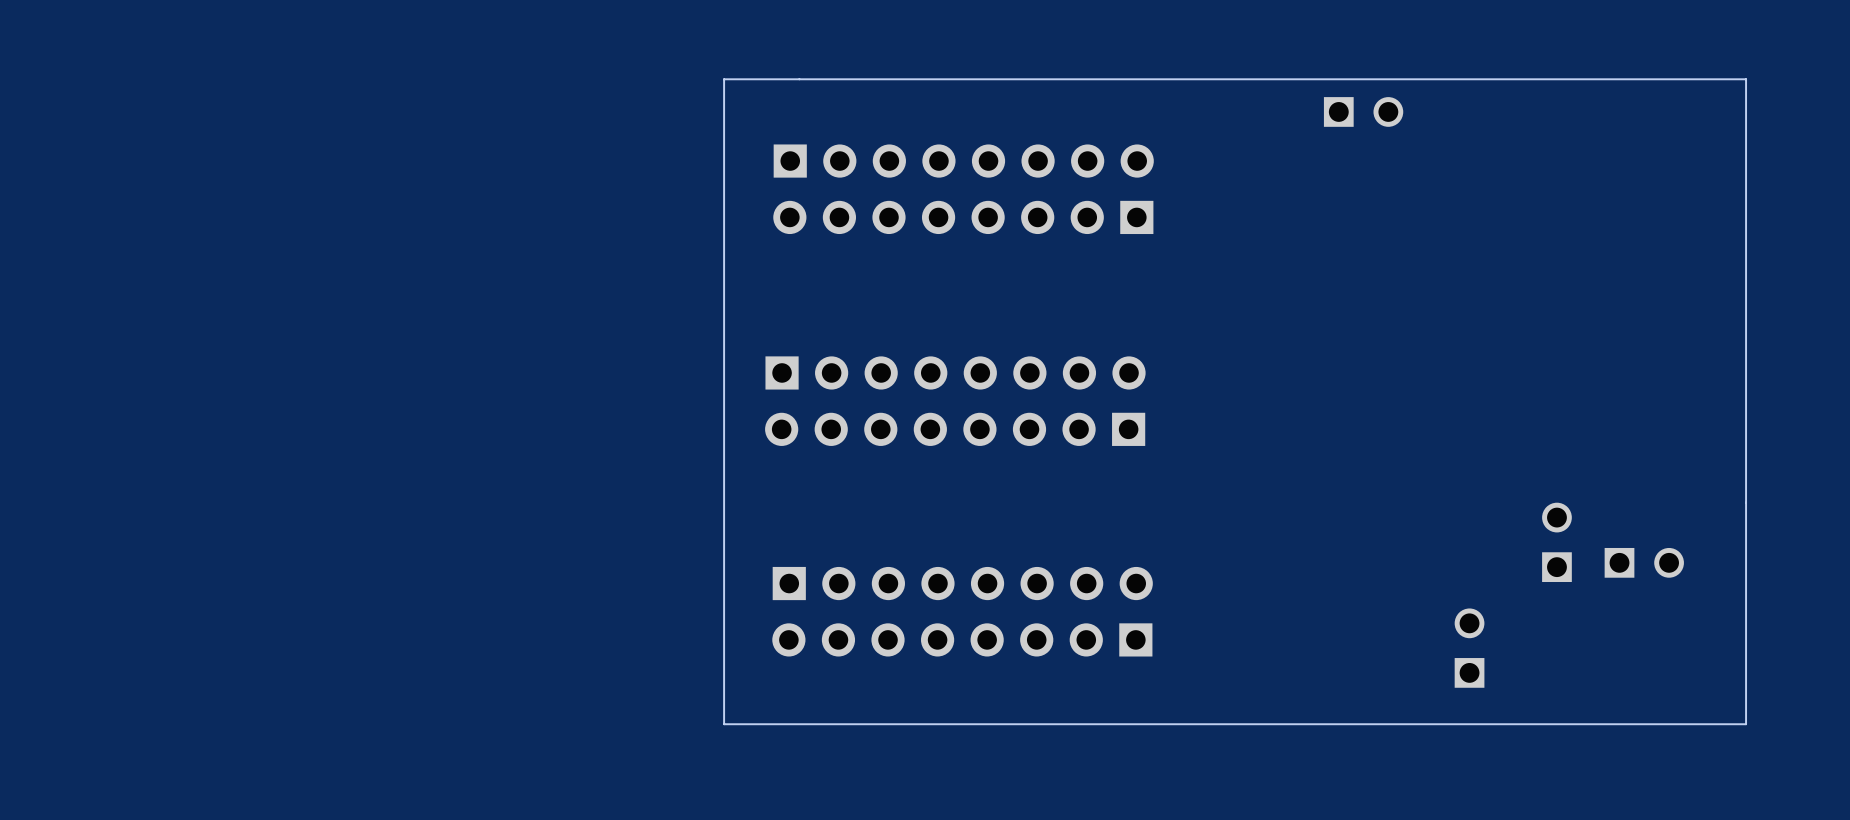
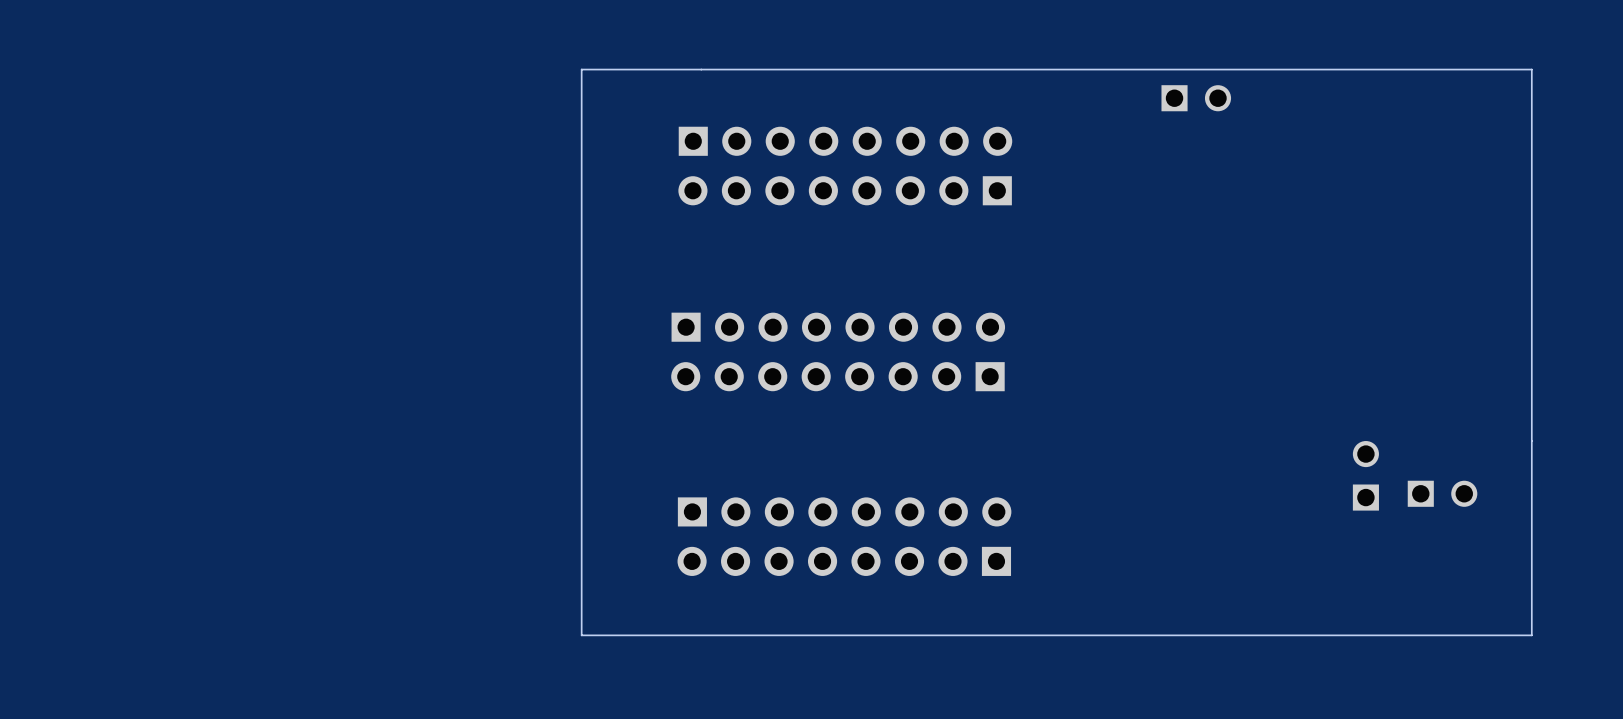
board edge: (724, 79) (724, 724) -> (635, 69) (581, 69) (581, 635) (635, 635)
part: (1469, 648) -> none

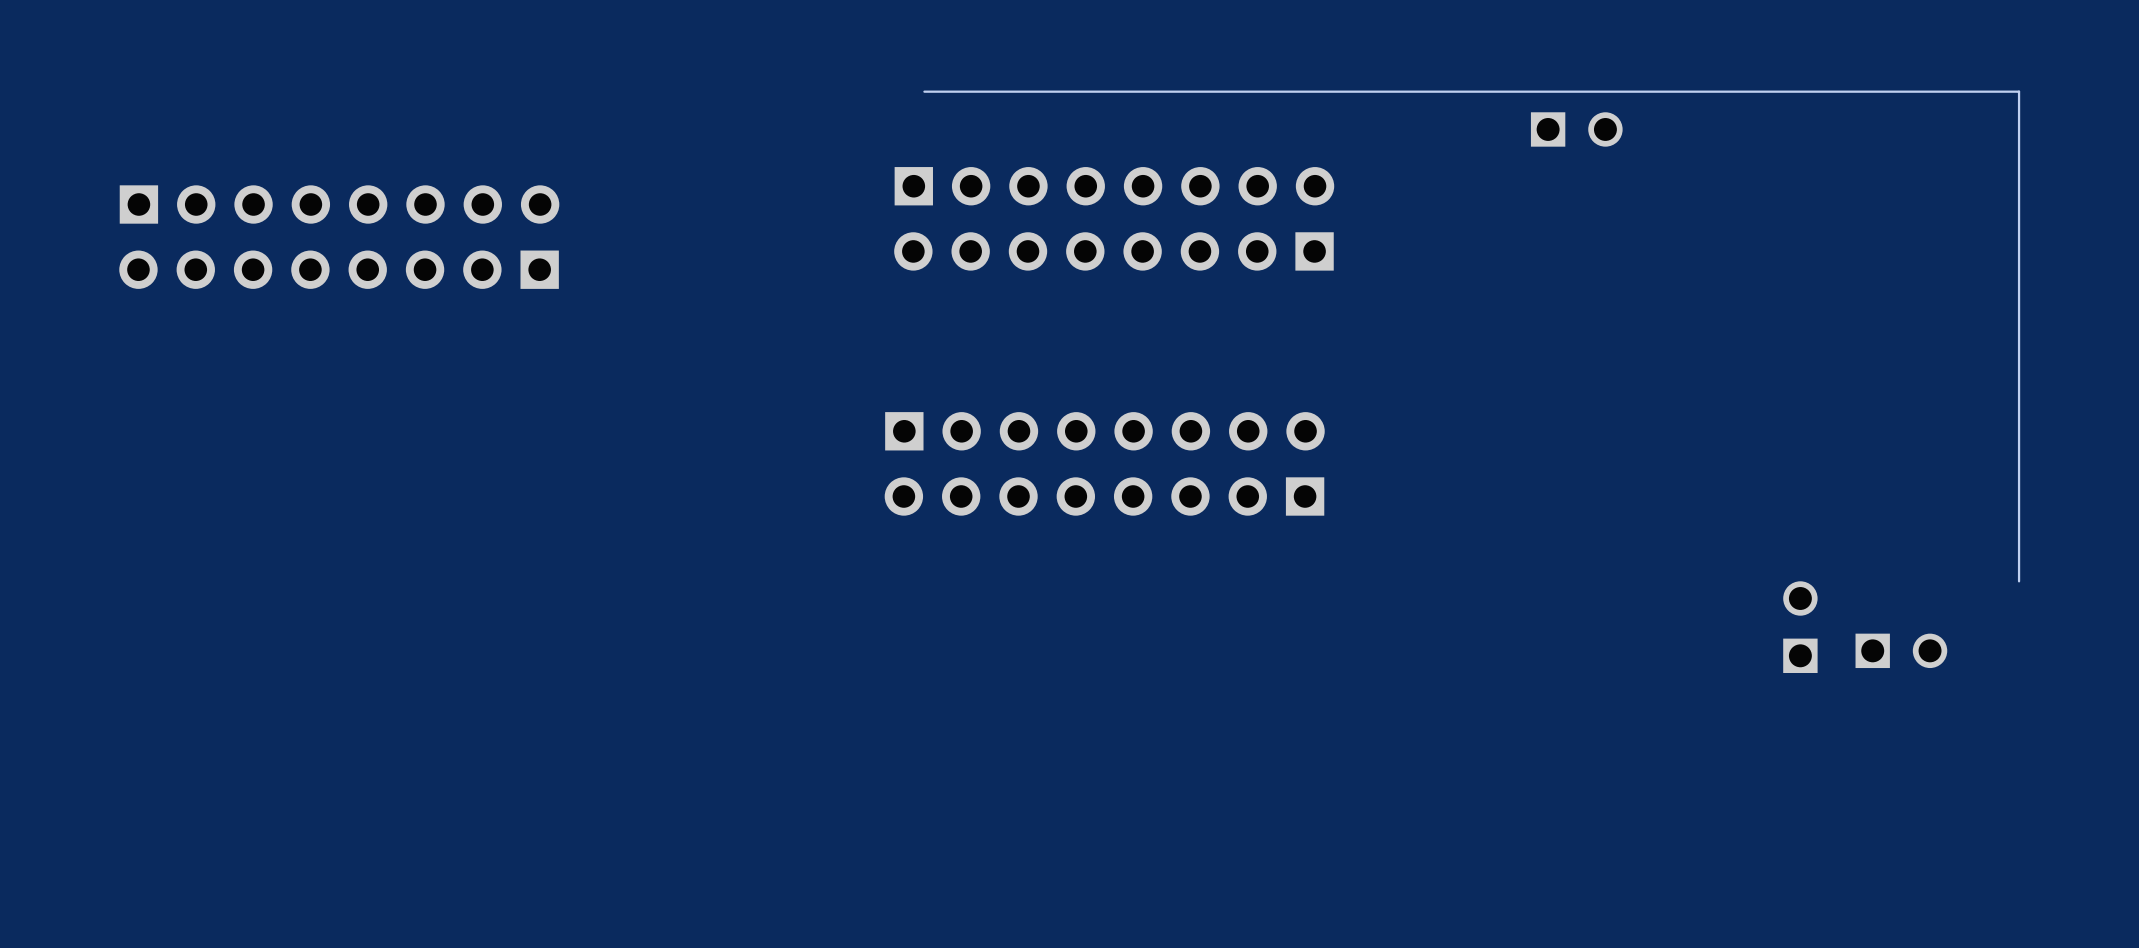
board edge: (701, 69) (581, 69) (581, 635) (1531, 635) (1531, 441) -> none
part: none -> (339, 204)
part: none -> (339, 269)
part: (844, 511) -> none
part: (844, 561) -> none

